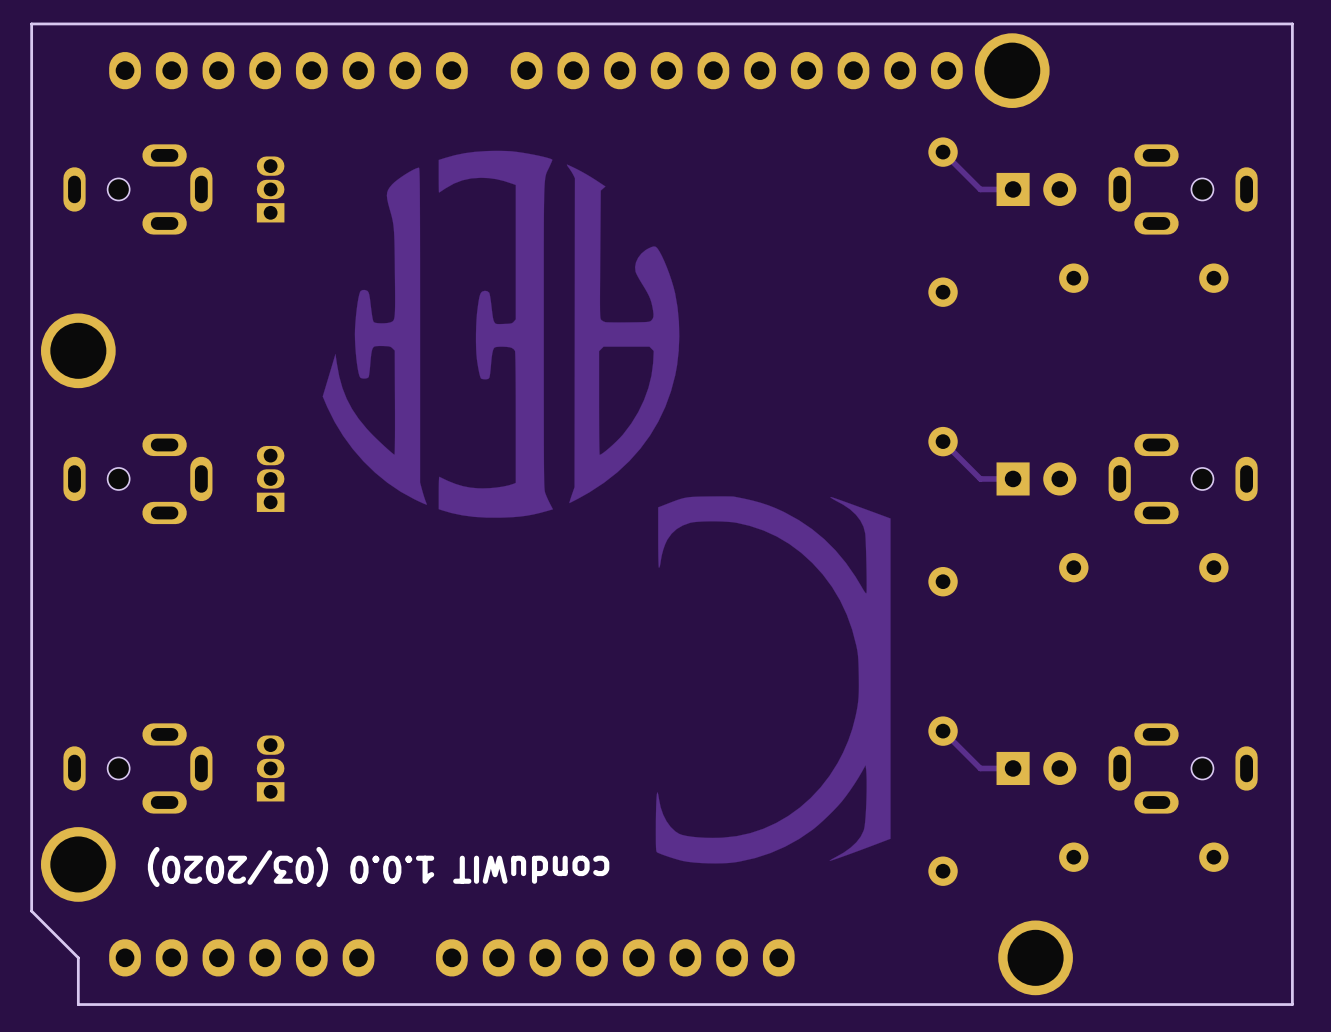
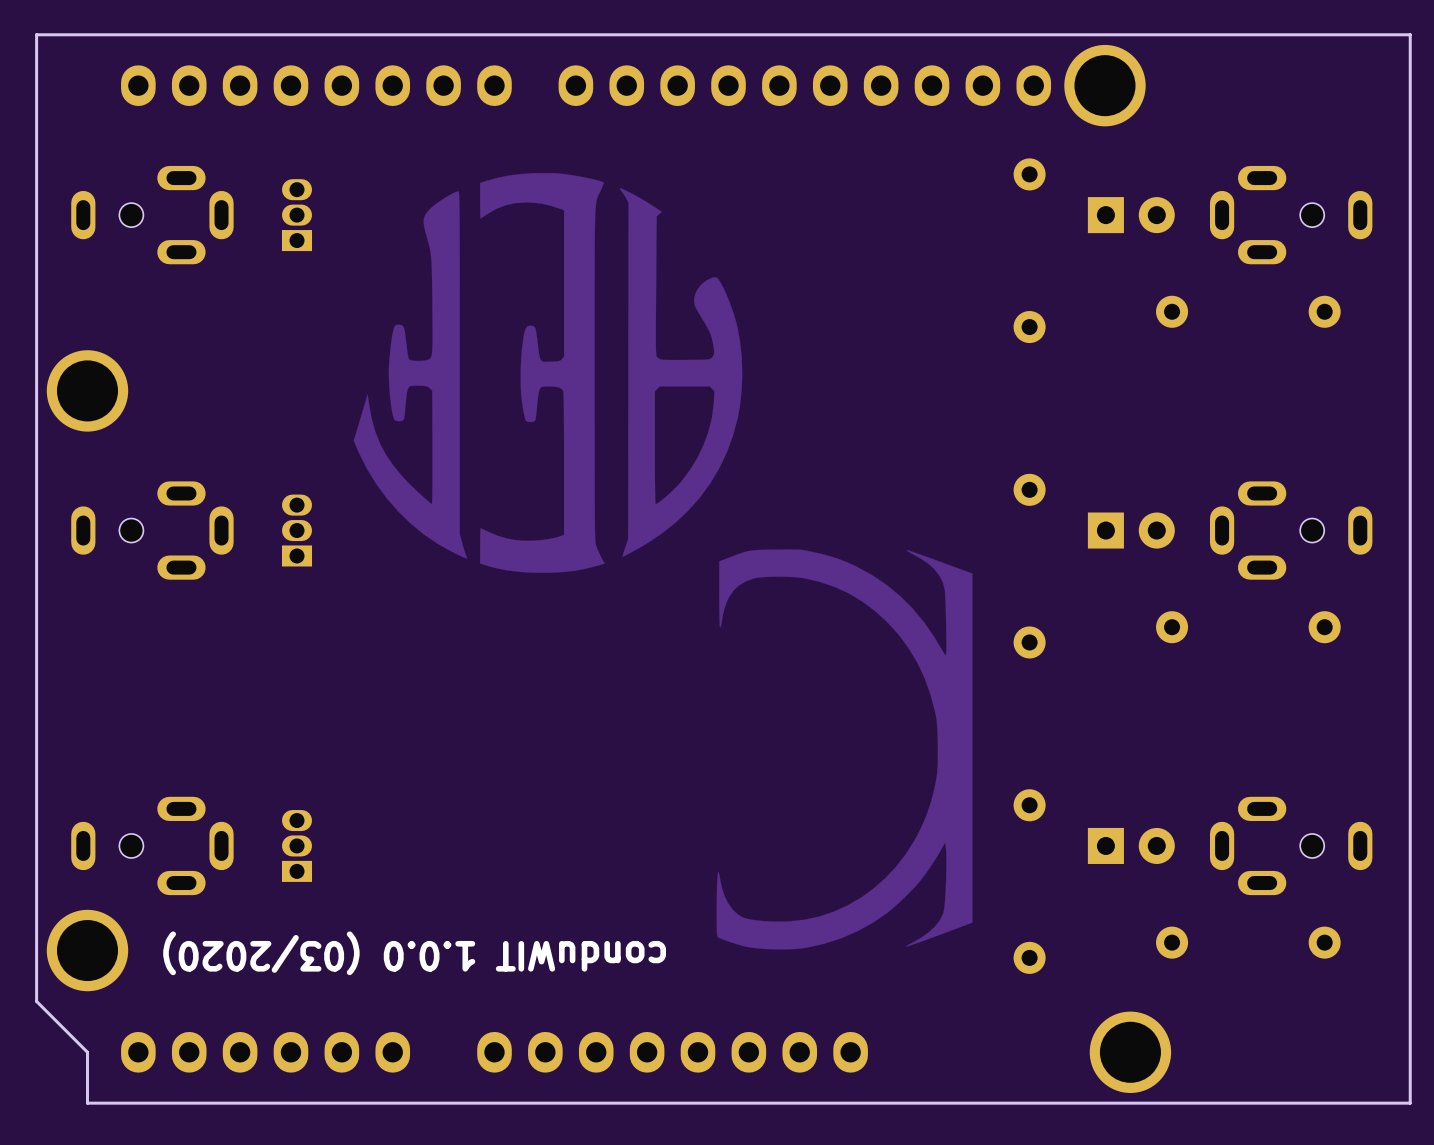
track: (943, 152) (980, 189) (1013, 189) -> none
track: (943, 441) (980, 478) (1013, 478) -> none
track: (943, 731) (980, 768) (1013, 768) -> none

